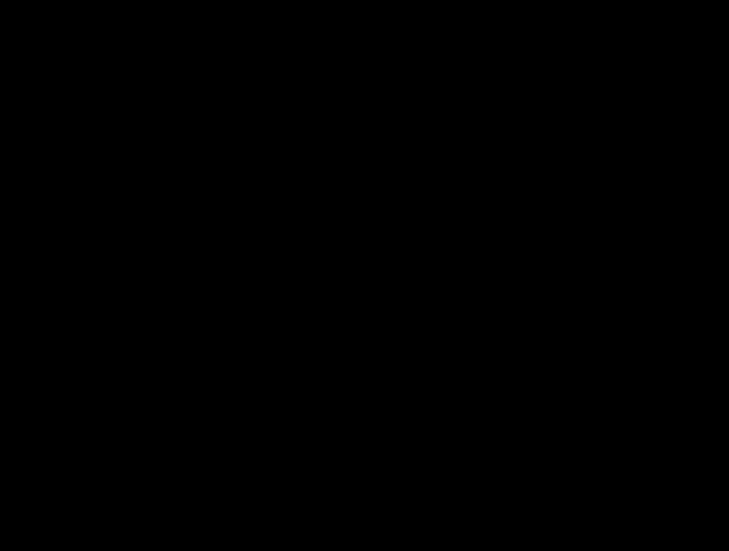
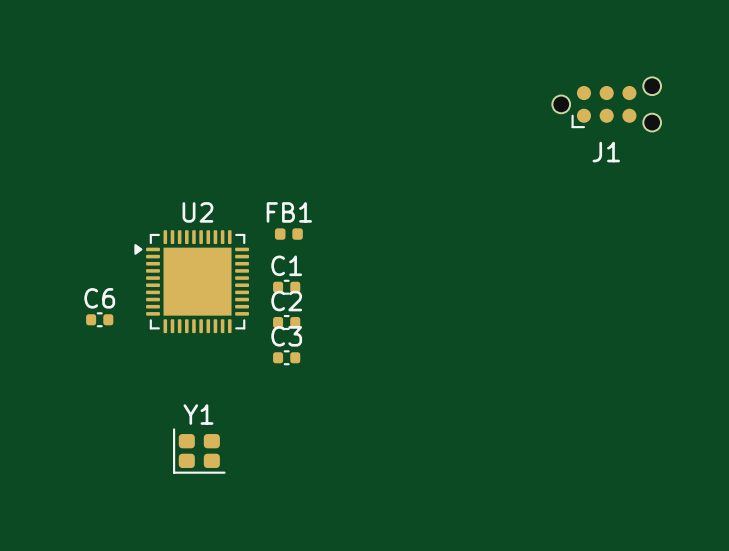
J1: none -> (606, 104)
FB1: none -> (288, 234)
U2: none -> (191, 281)
C1: none -> (286, 287)
C6: none -> (99, 319)
C2: none -> (286, 322)
C3: none -> (286, 357)
Y1: none -> (199, 451)

